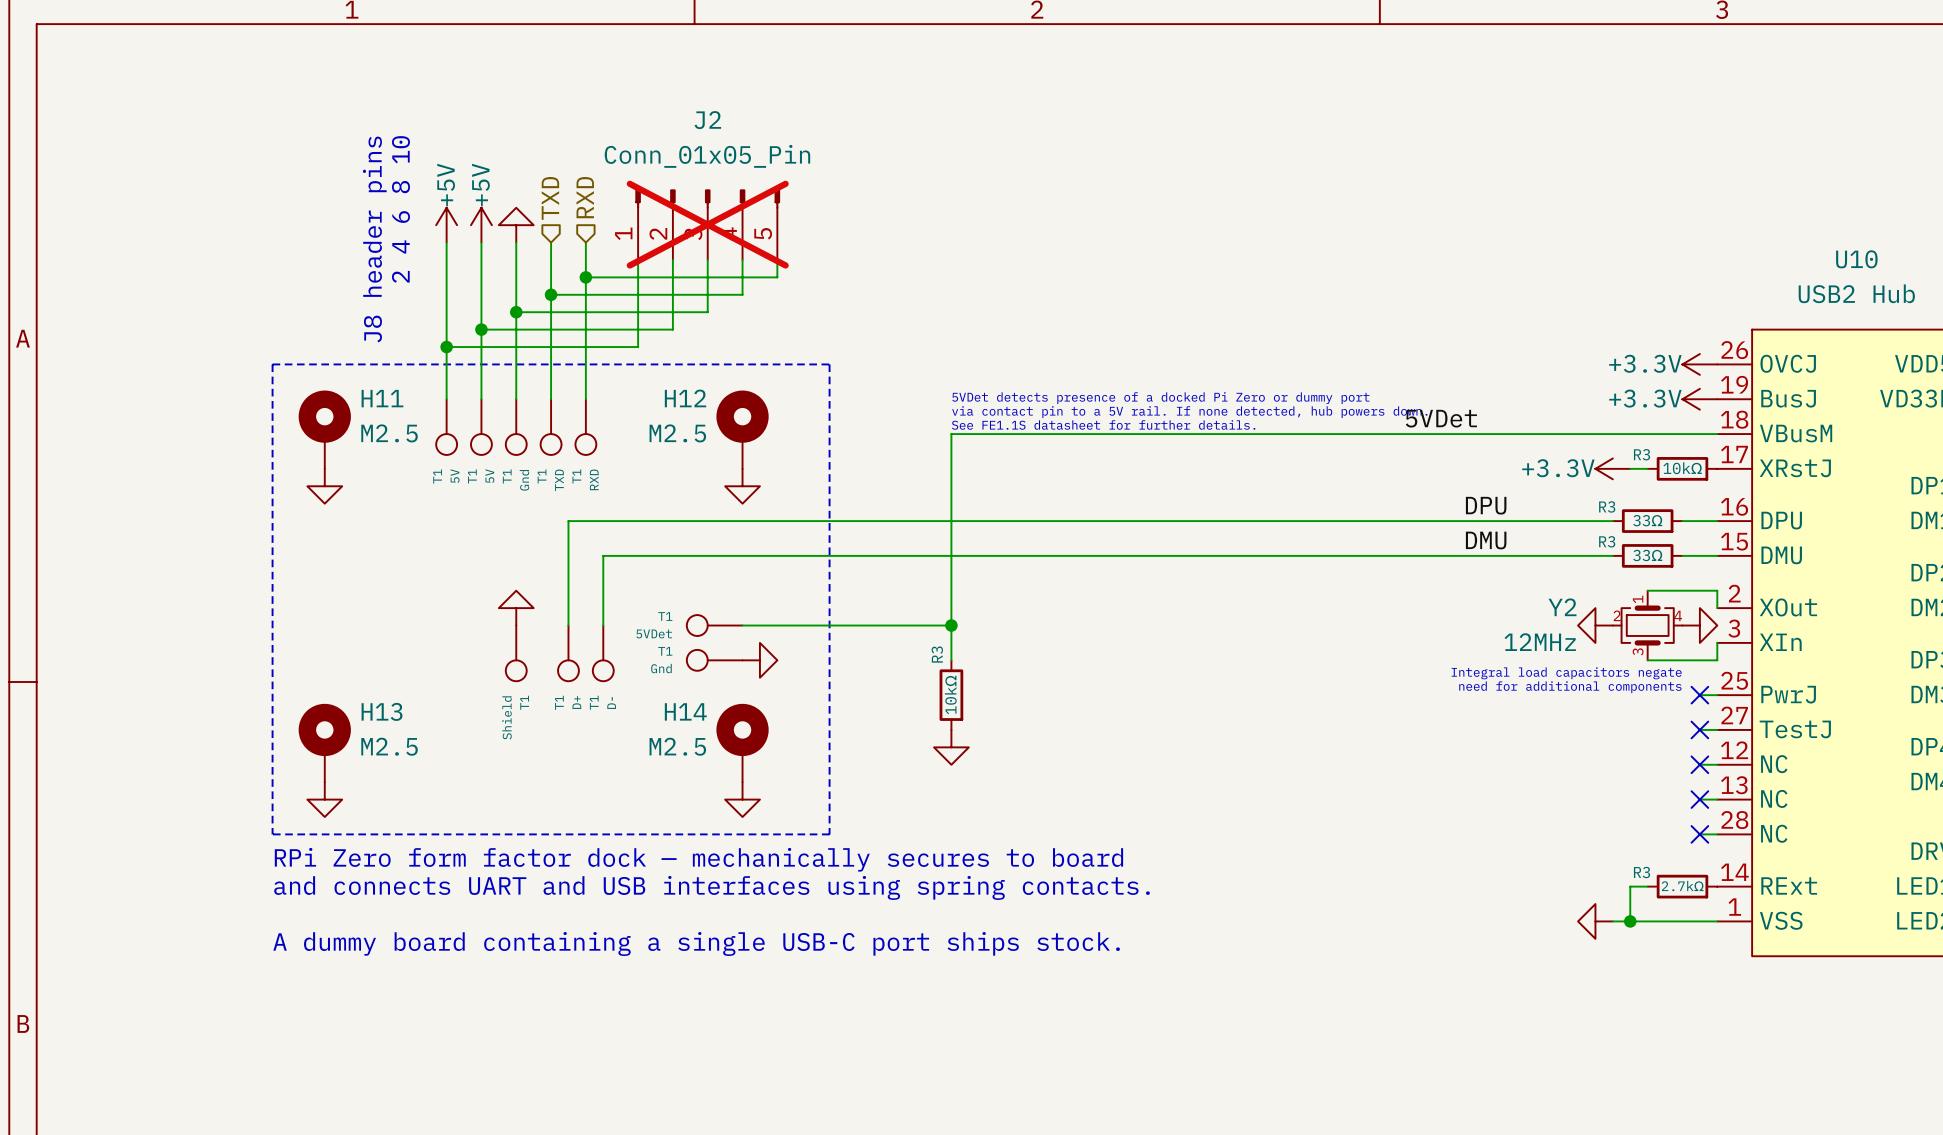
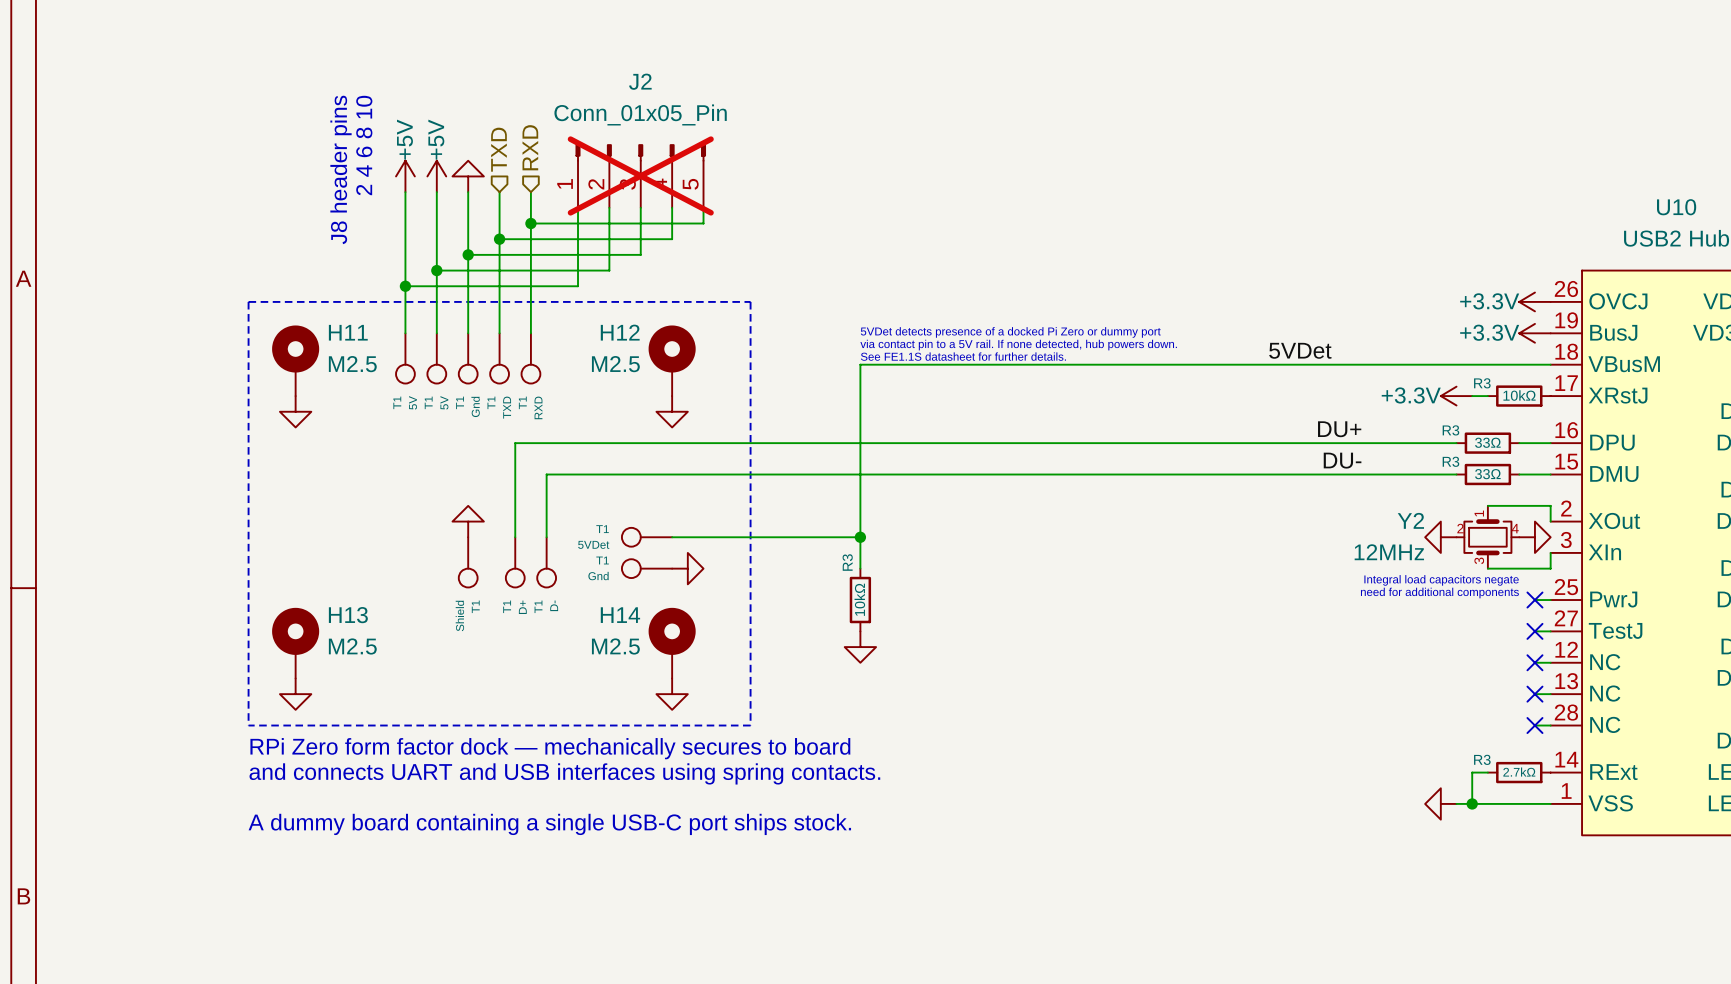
label: DPU (1486, 505) -> DU+ (1339, 429)
label: DMU (1486, 540) -> DU- (1342, 460)

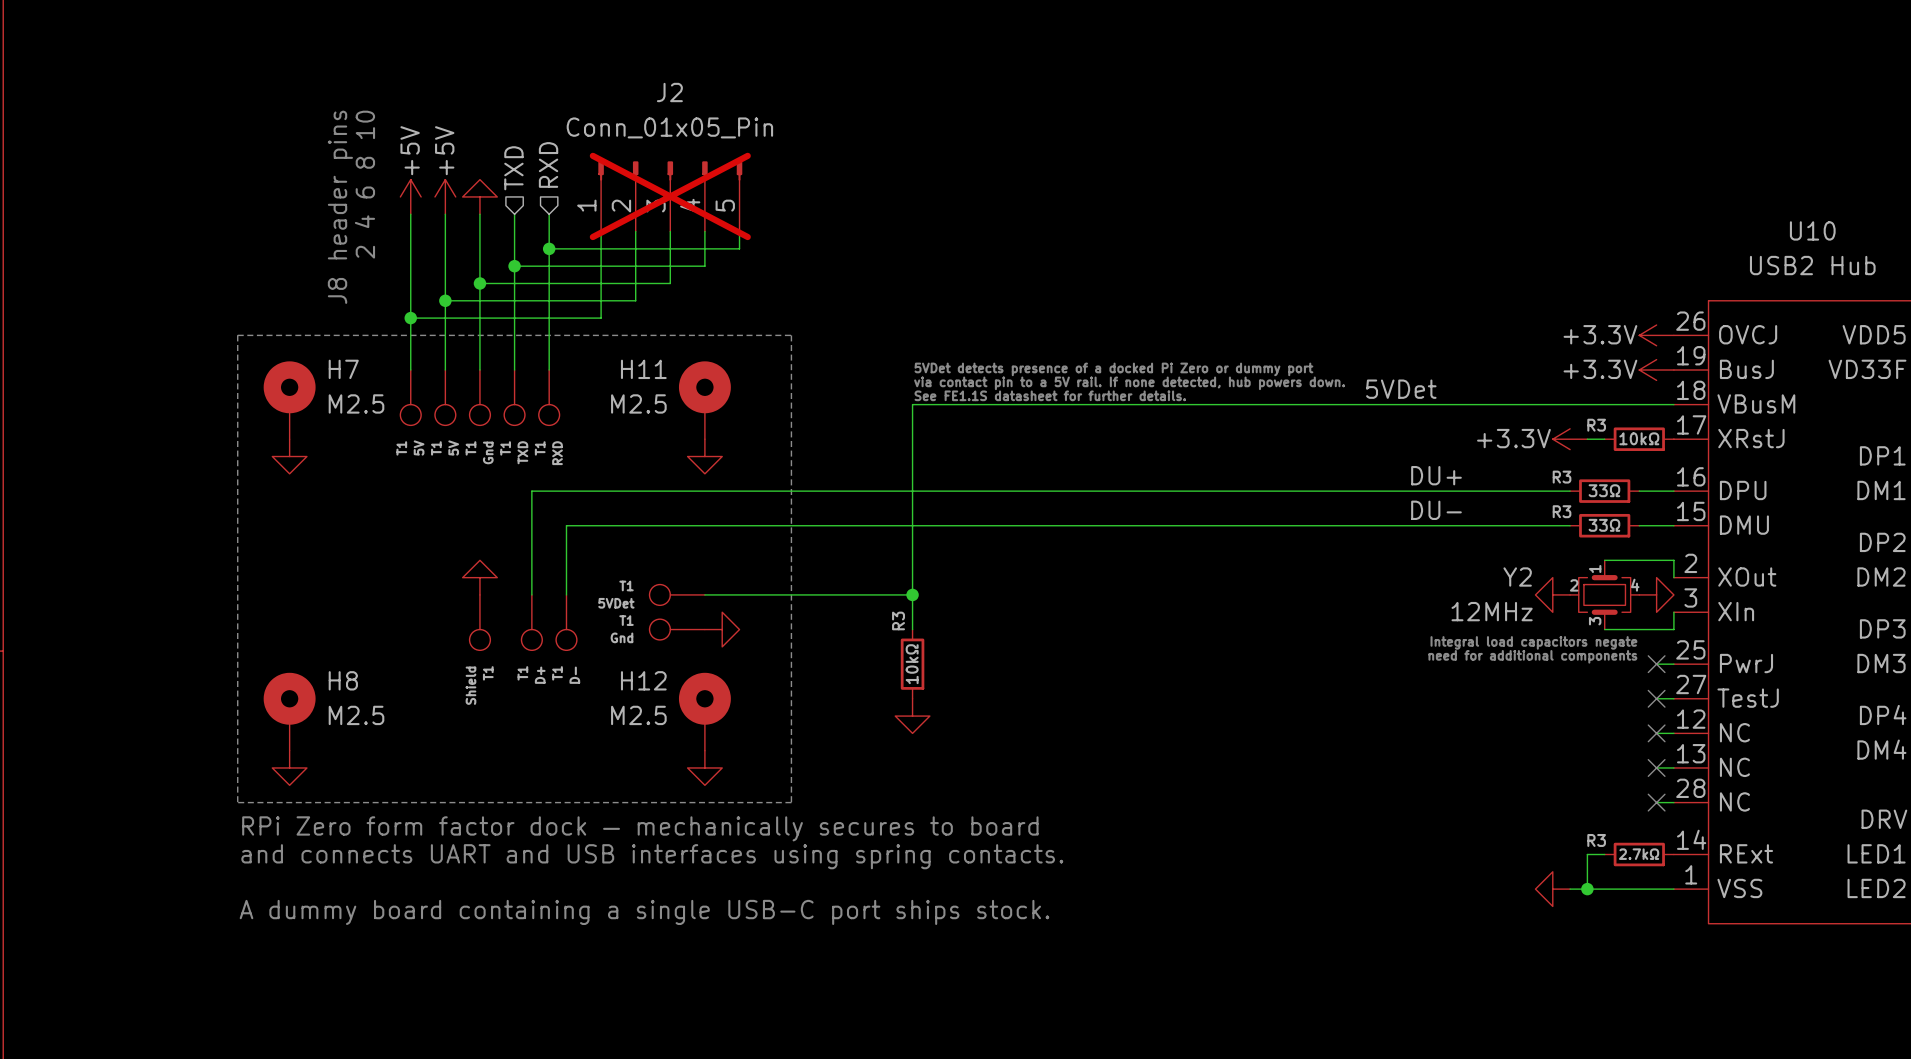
H11 name: H11 (348, 332) -> H7 (343, 369)
H12 name: H12 (620, 332) -> H11 (643, 369)
H13 name: H13 (348, 615) -> H8 (343, 680)
H14 name: H14 (620, 615) -> H12 (643, 680)

